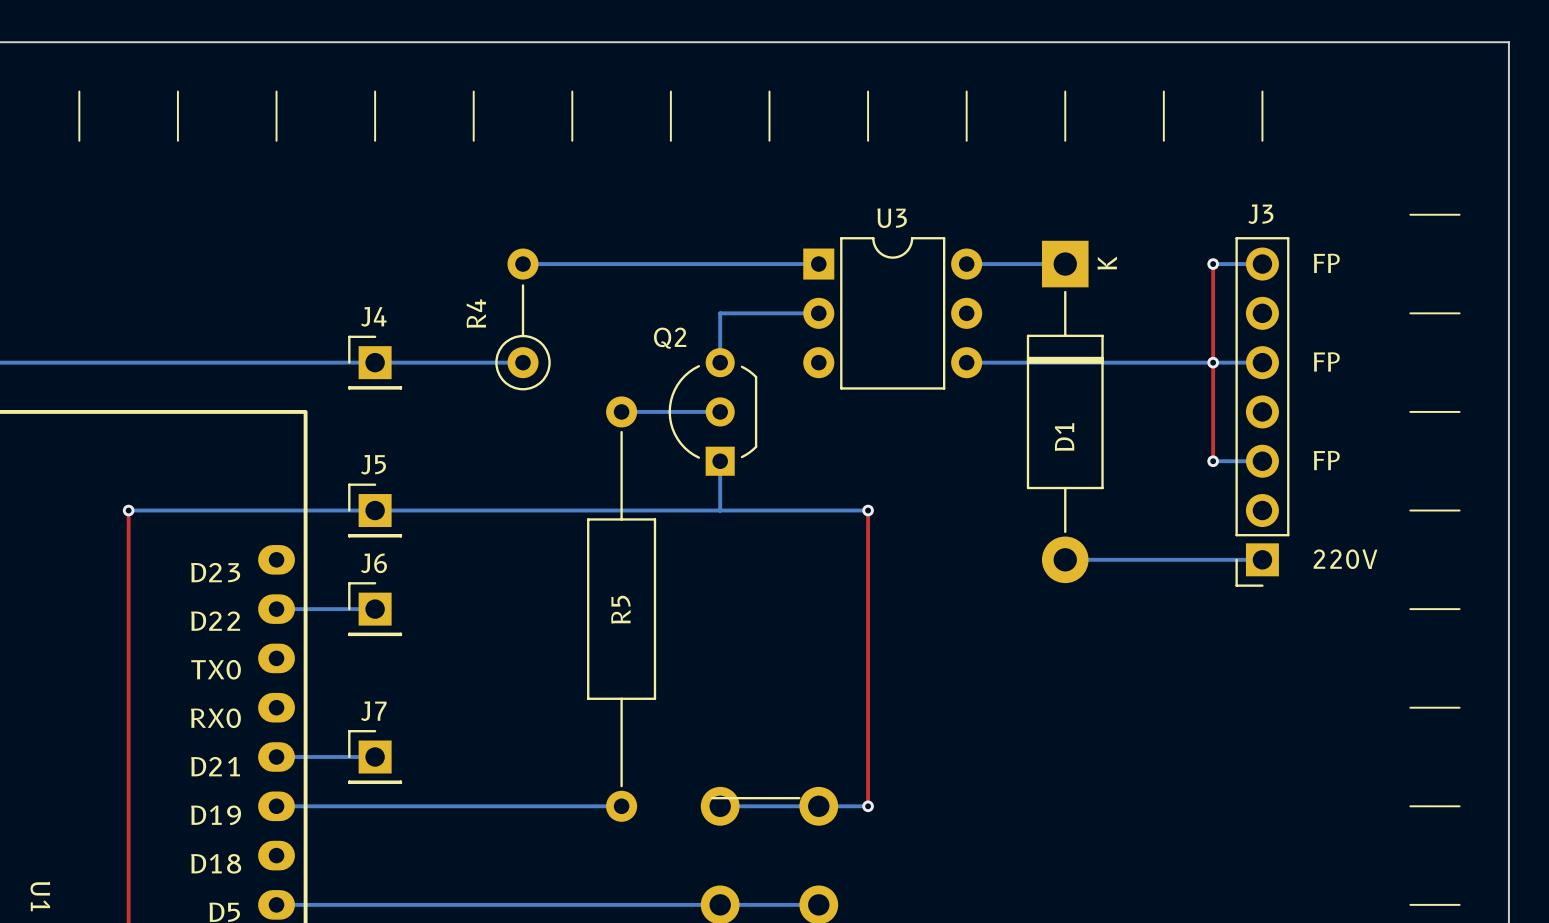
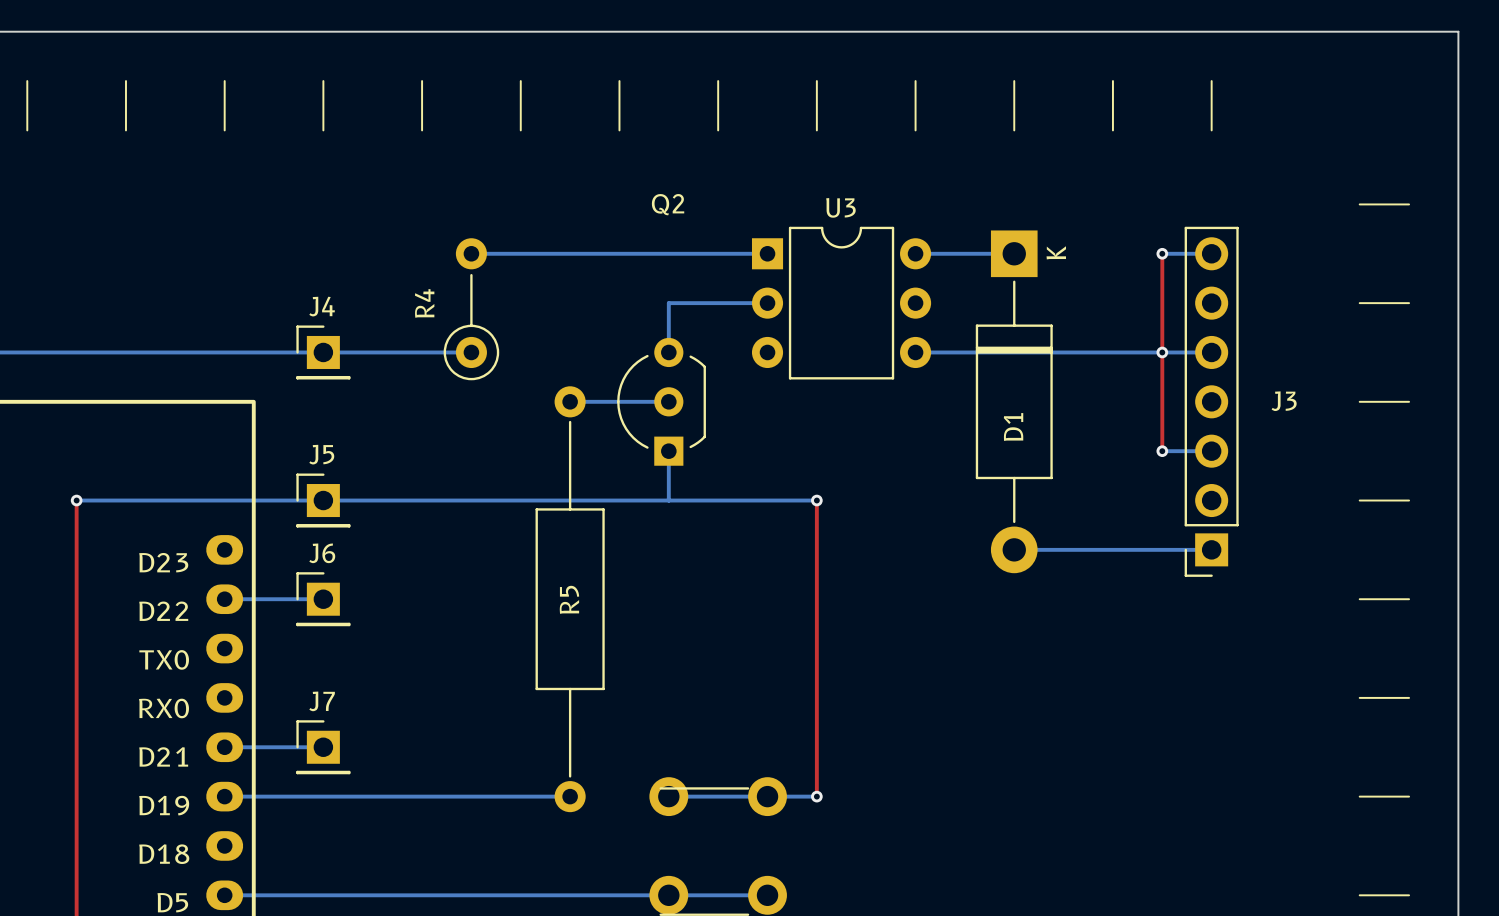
J3 name position: J3 (1260, 214) -> J3 (1284, 401)
text: FP (1326, 263) -> none
Q2 name position: Q2 (670, 338) -> Q2 (668, 204)
text: FP (1326, 361) -> none
text: FP (1326, 460) -> none
text: 220V (1345, 559) -> none

